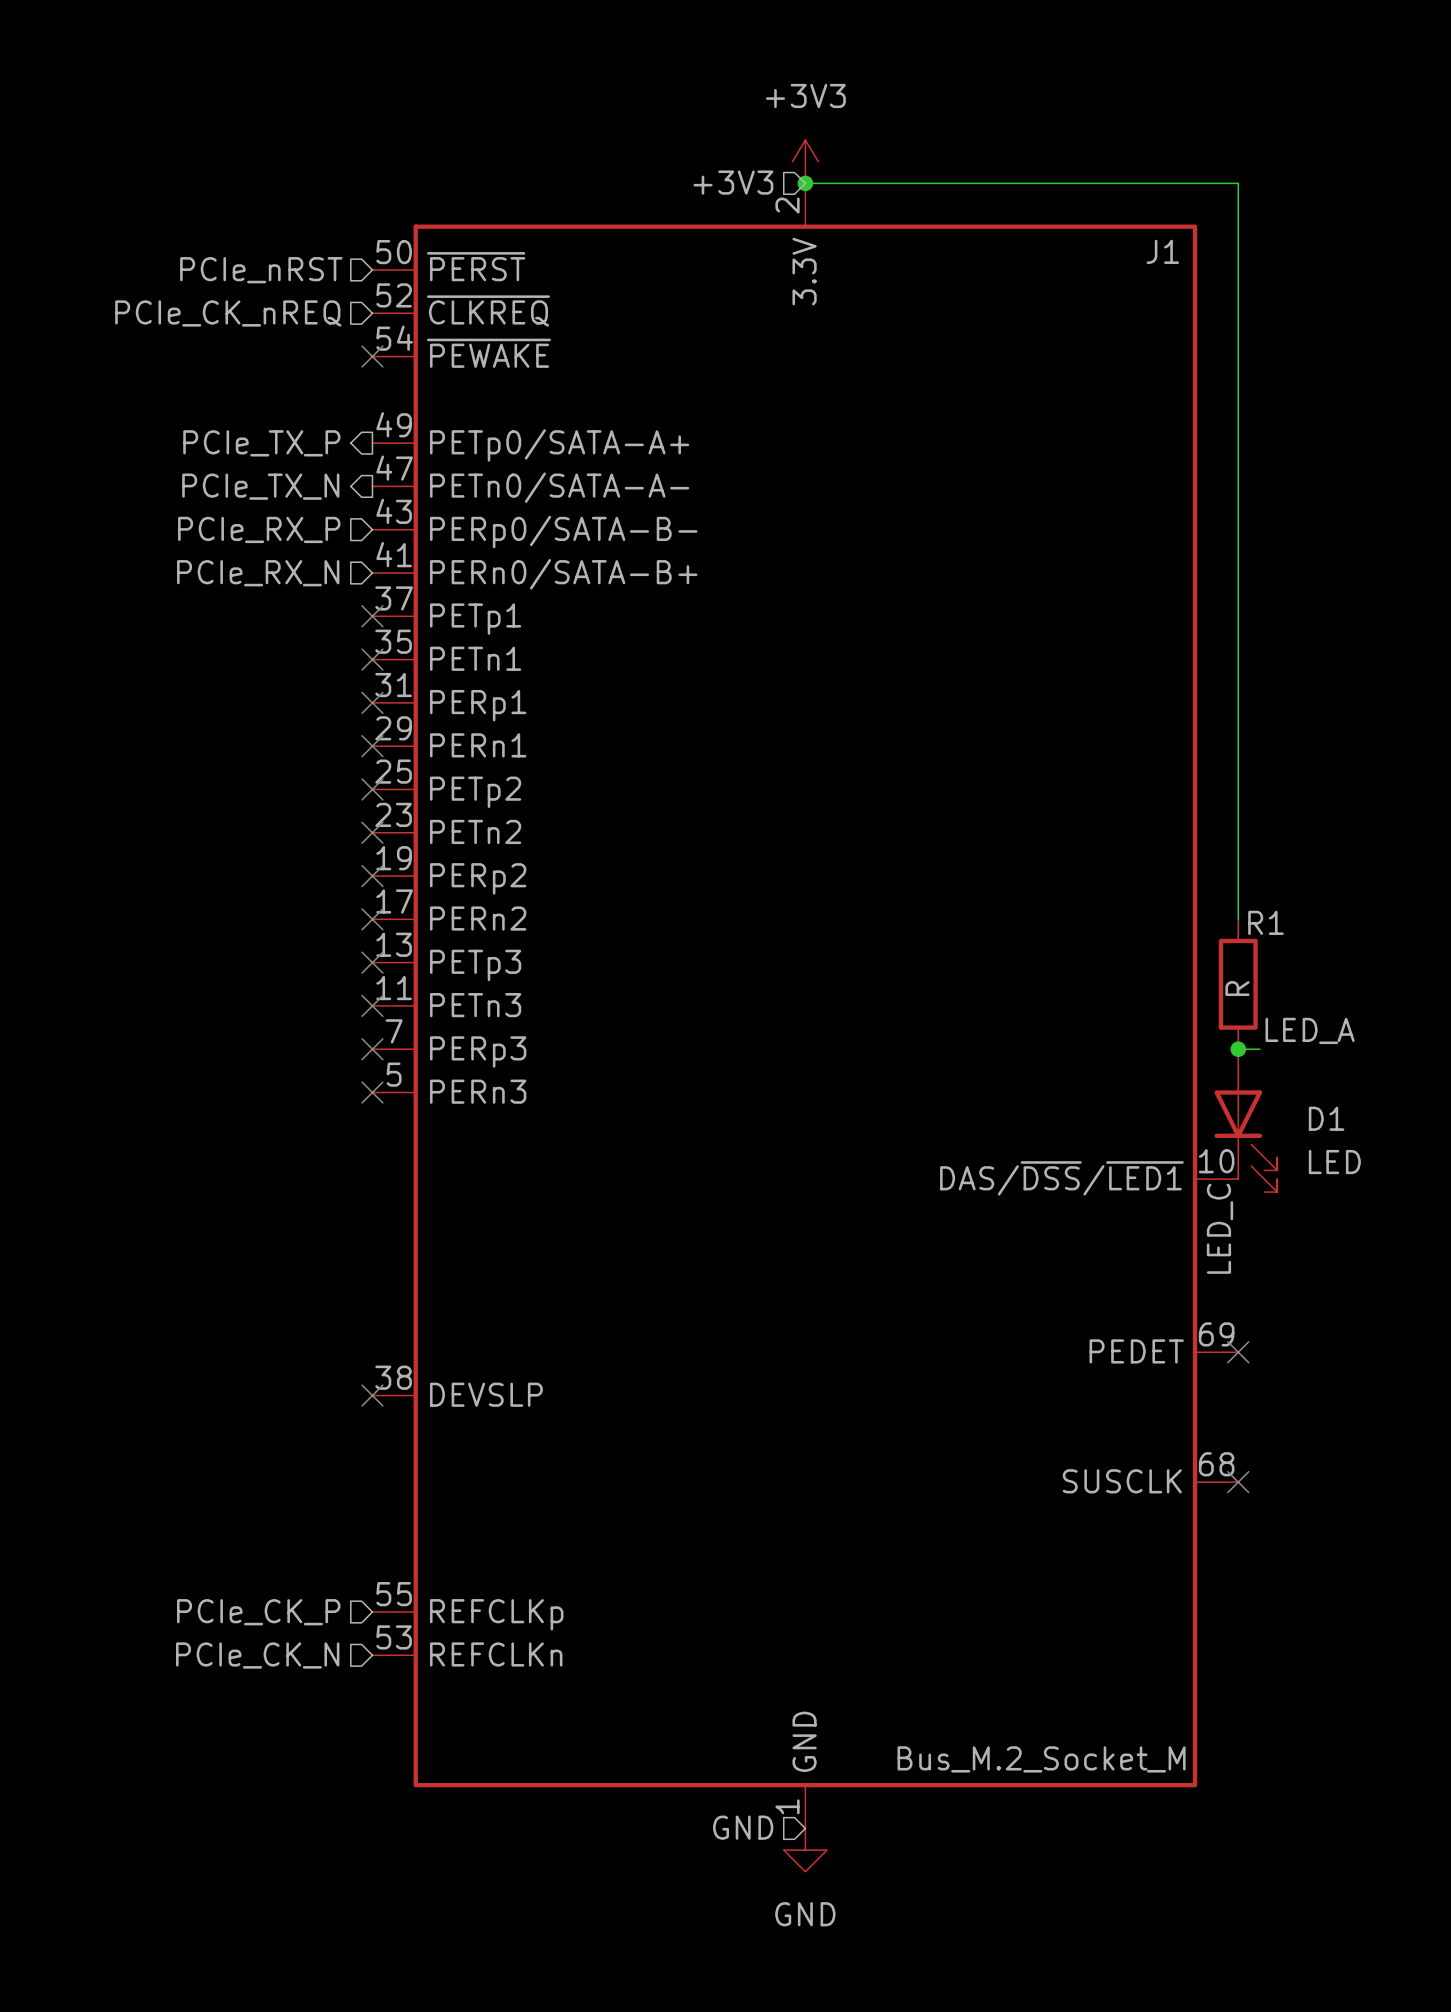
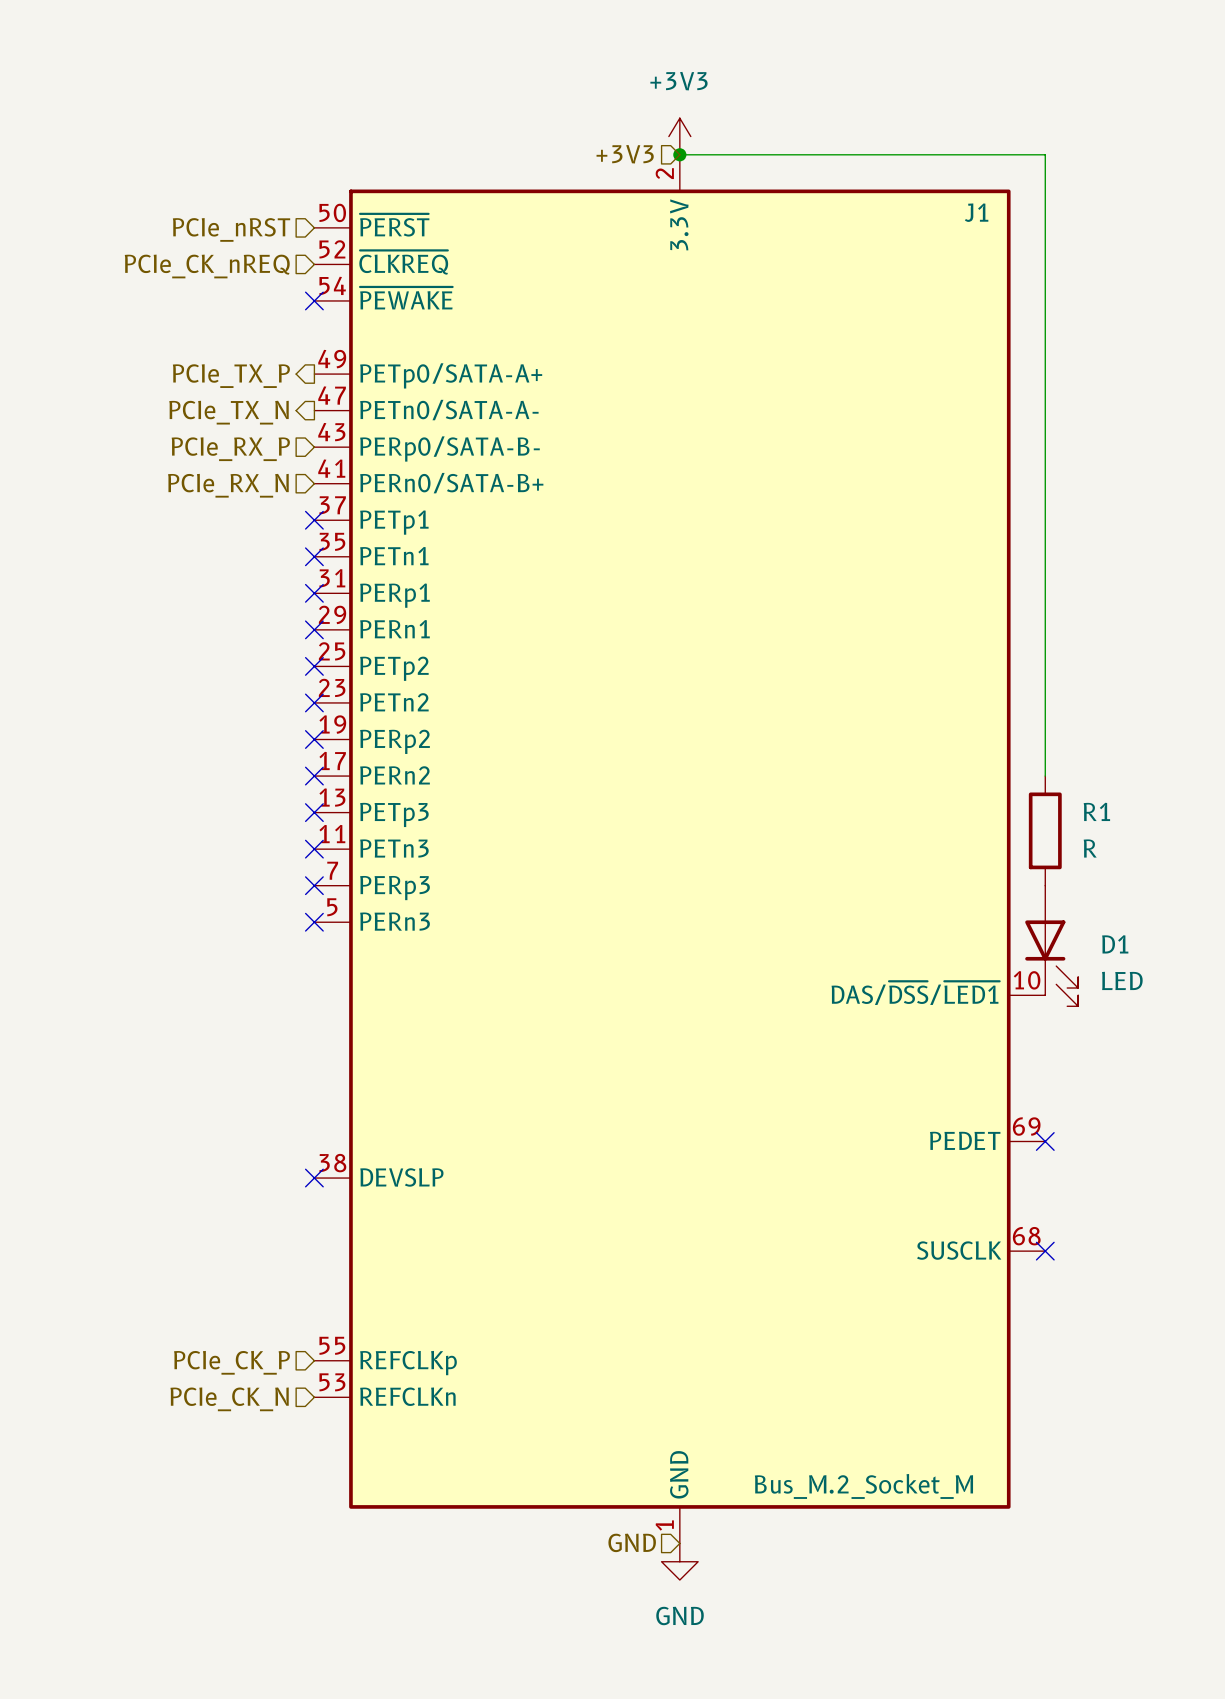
R1 name position: R1 (1265, 922) -> R1 (1096, 811)
R1 value rotation: 0° (1237, 988) -> 90° clockwise (1090, 848)
R1 value position: R (1237, 988) -> R (1090, 848)
label: LED_A (1310, 1030) -> none
wire: (1238, 1049) (1259, 1049) -> none
junction: (1238, 1049) -> none
label: LED_C (1220, 1228) -> none

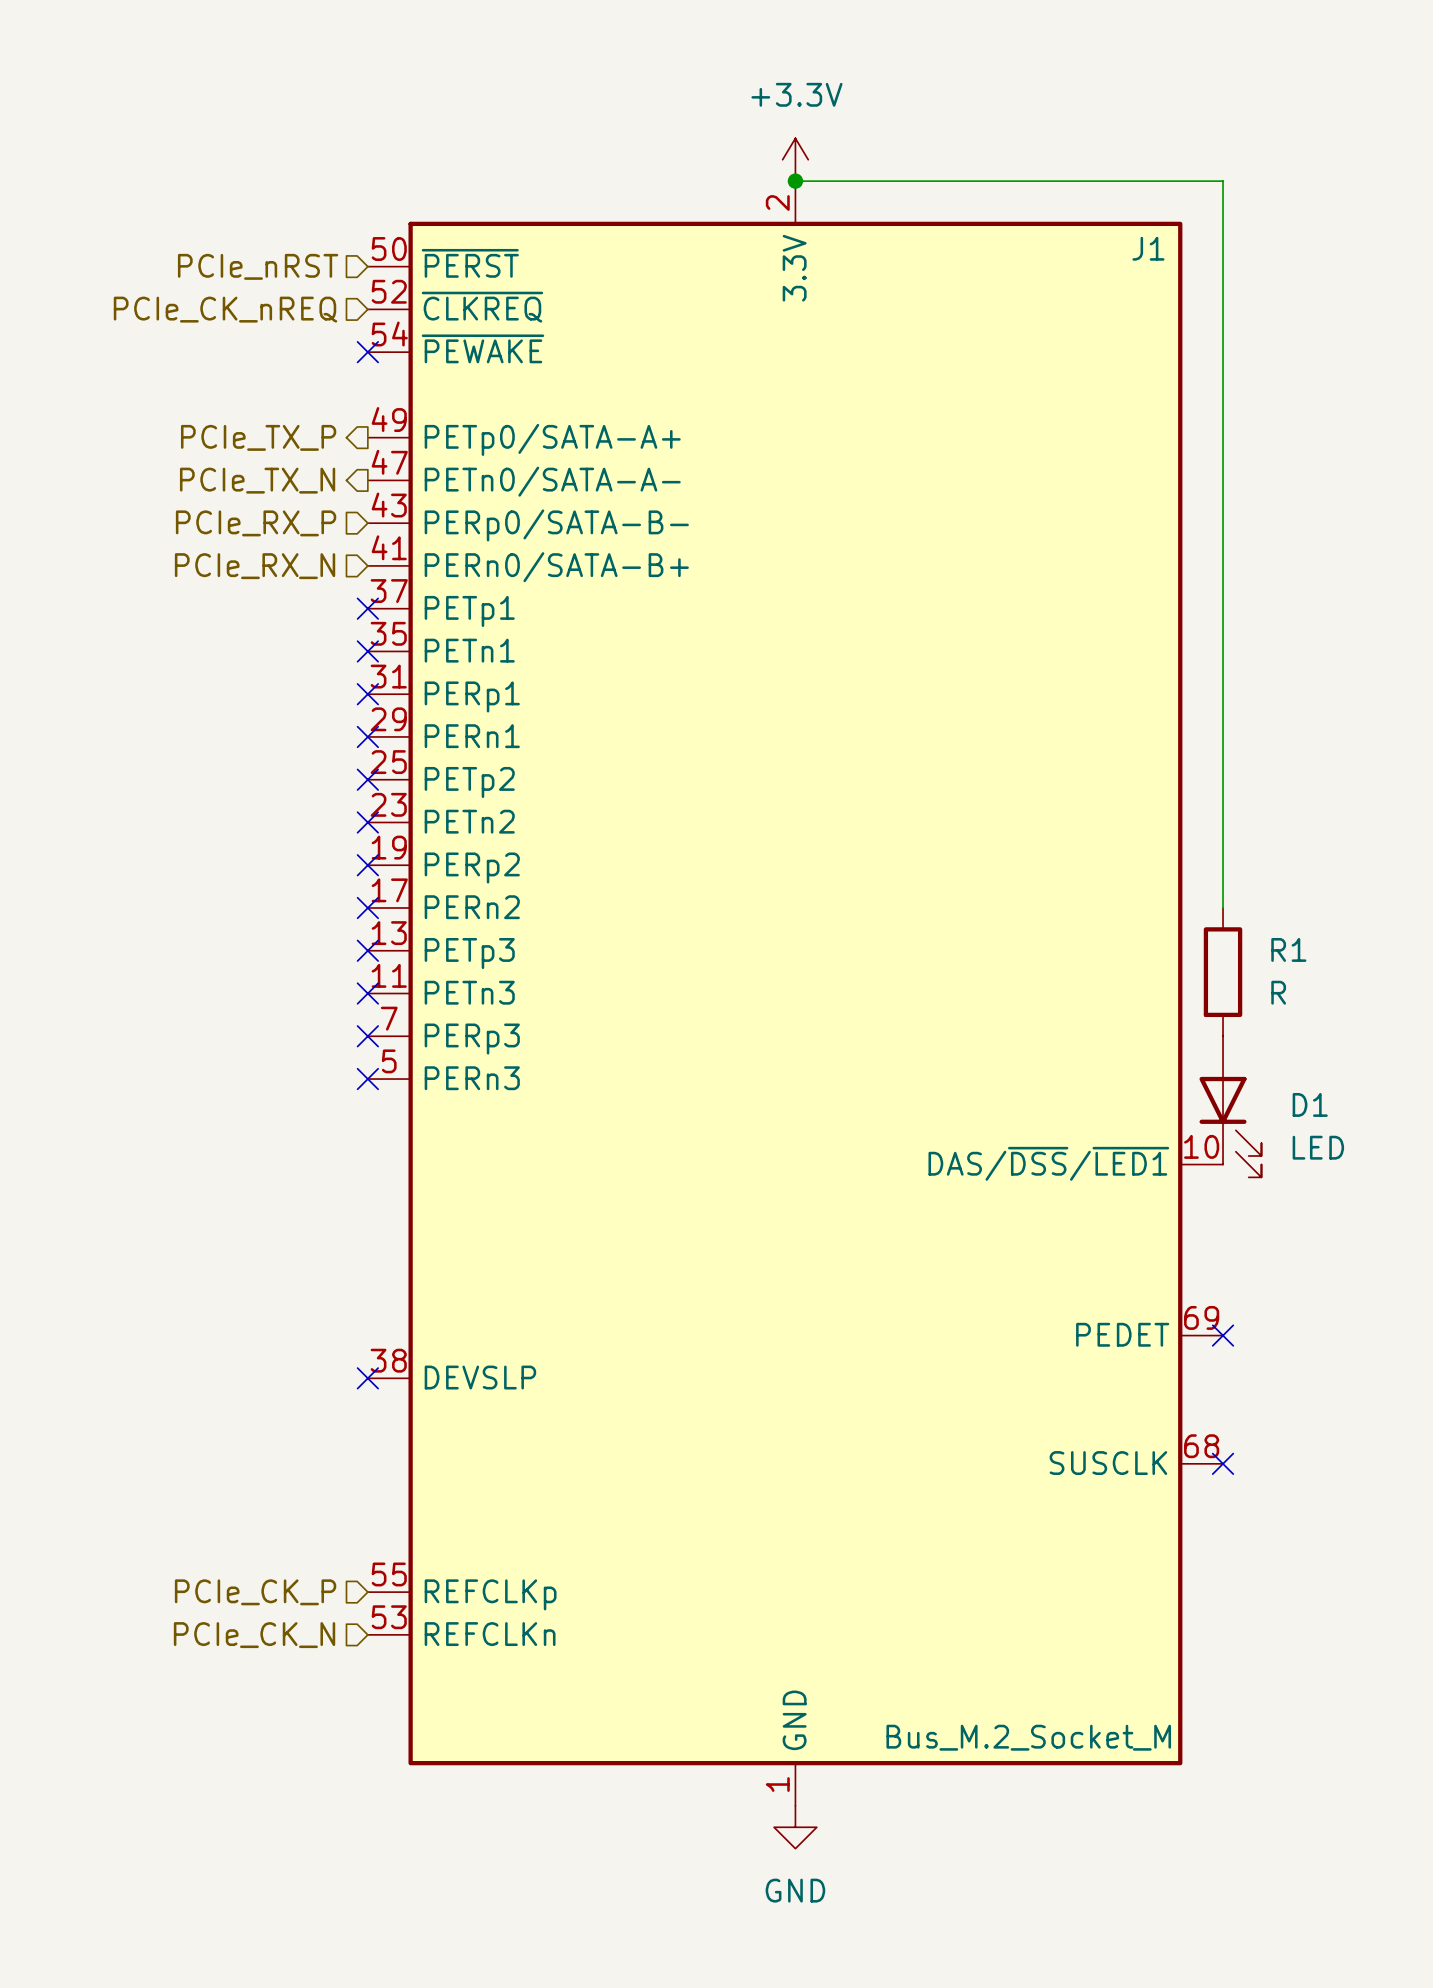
power symbol: +3V3 (679, 136) -> +3.3V (795, 159)
hierarchical label: +3V3 (625, 154) -> none
hierarchical label: GND (632, 1542) -> none

